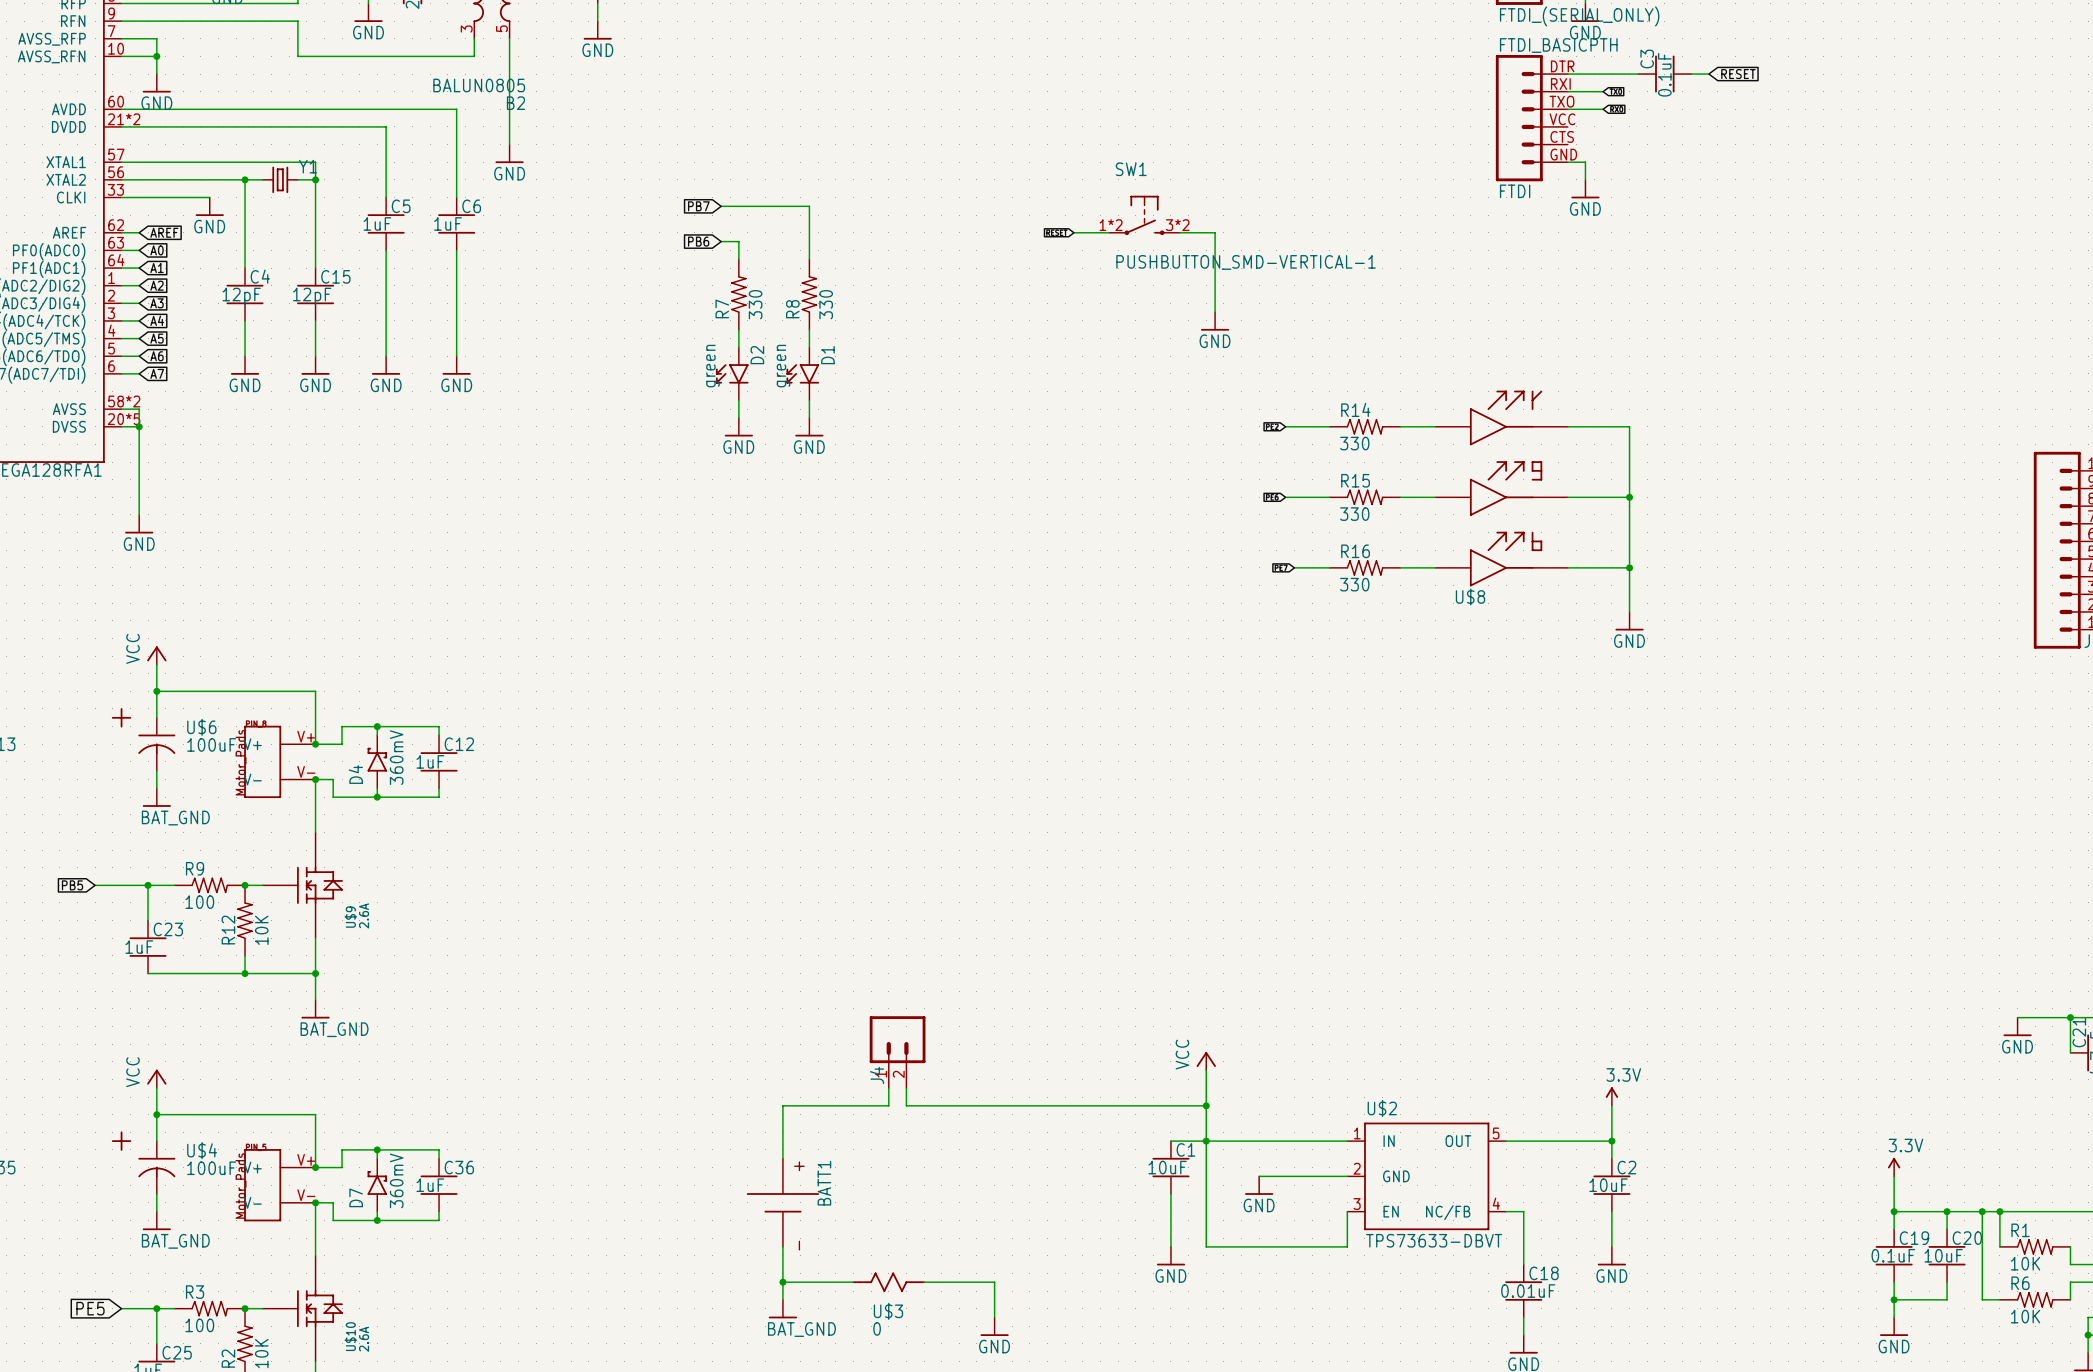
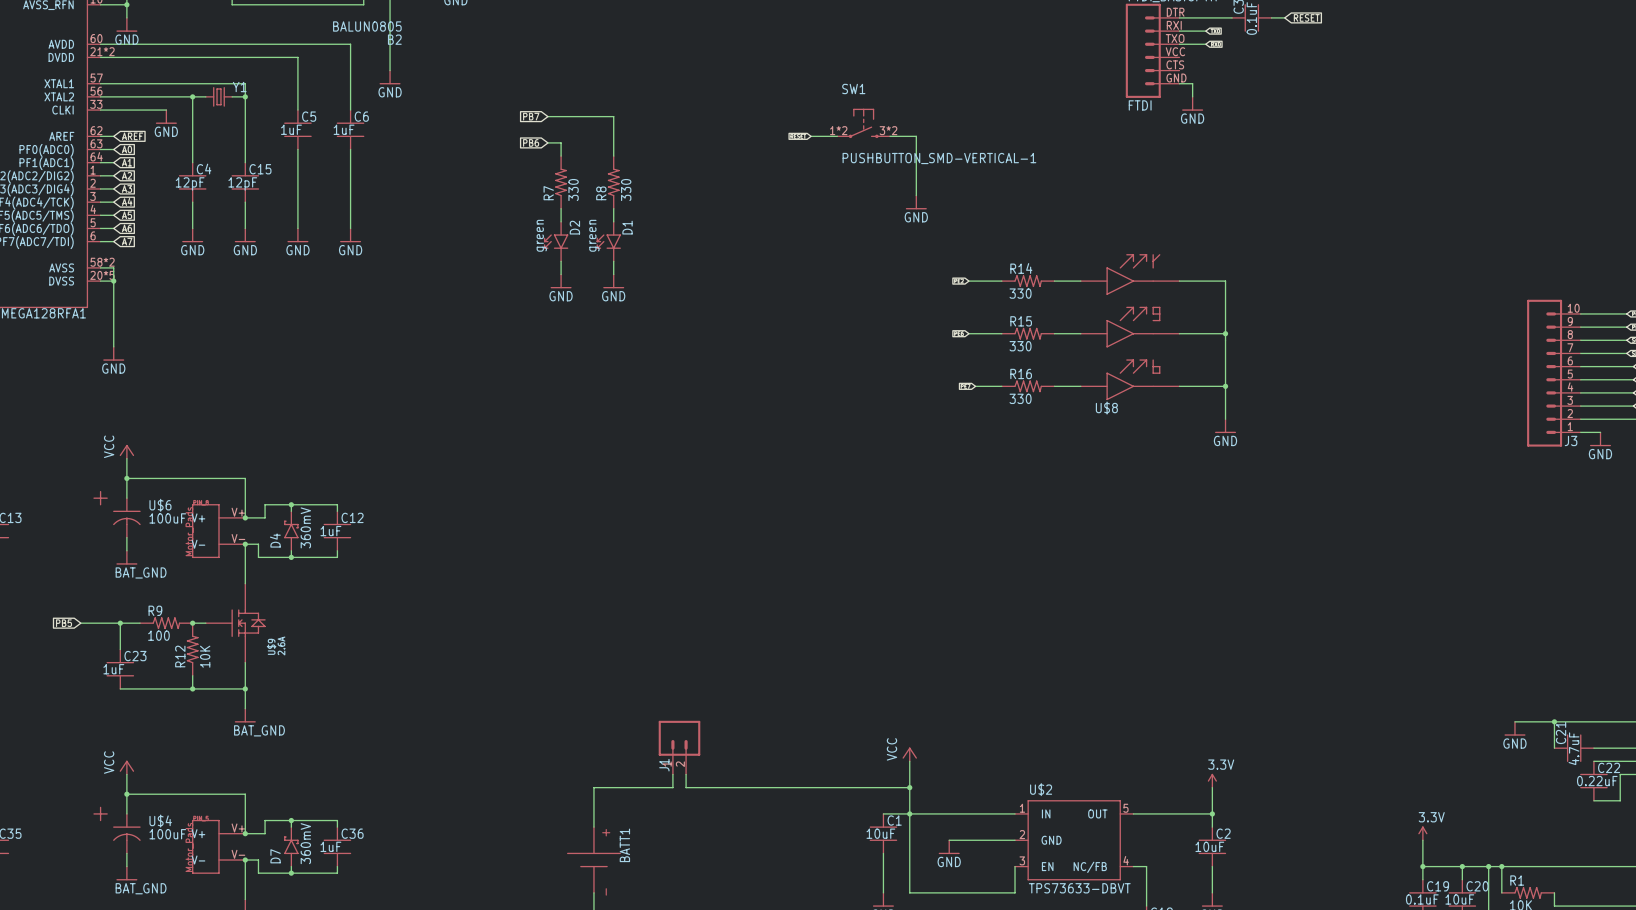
J4 name: J4 (877, 1075) -> J1 (664, 765)

